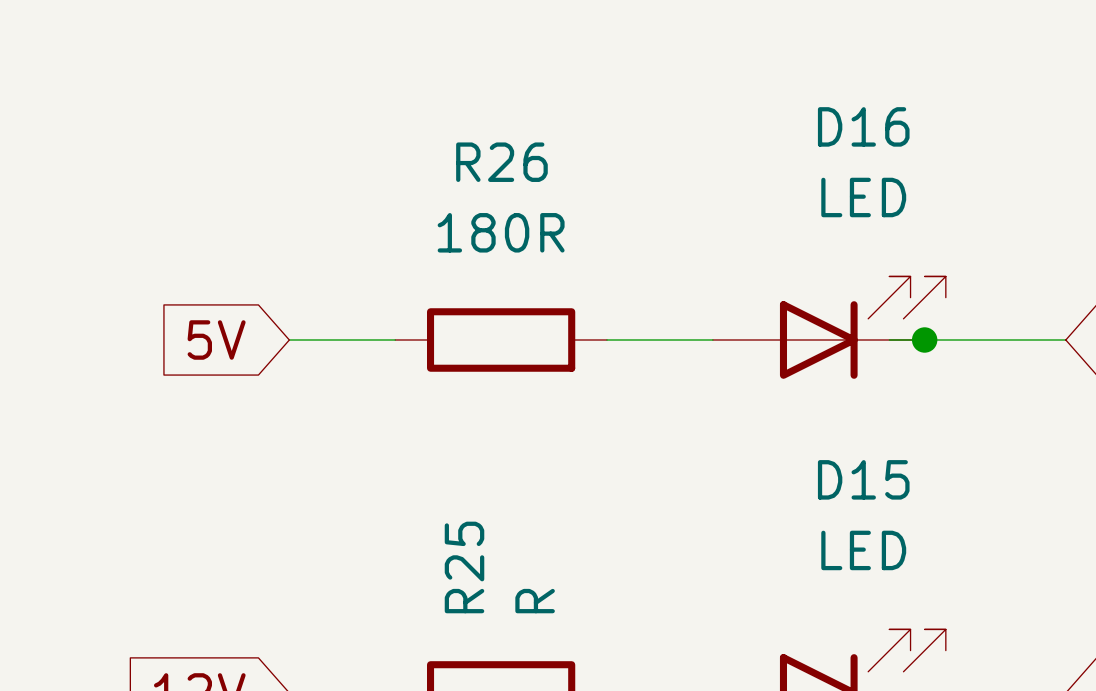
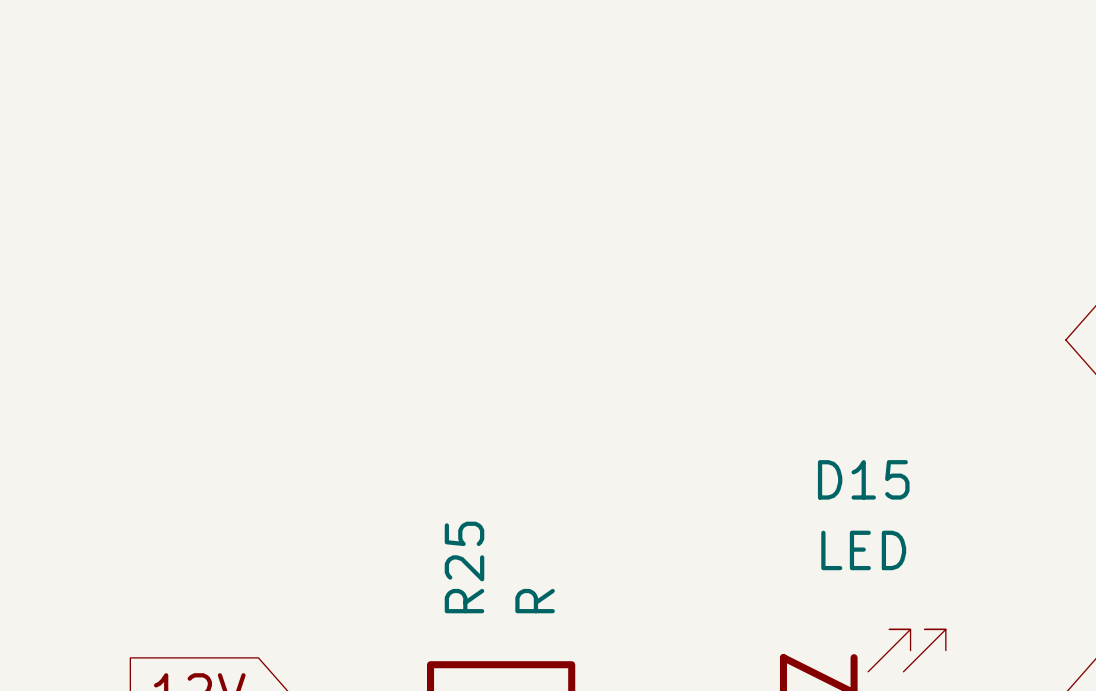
D16: LED (829, 327) -> none
global label: 5V (216, 340) -> none
wire: (289, 340) (395, 340) -> none
R26: 180R (501, 340) -> none
wire: (607, 340) (712, 340) -> none
wire: (889, 340) (1065, 340) -> none
junction: (924, 340) -> none

